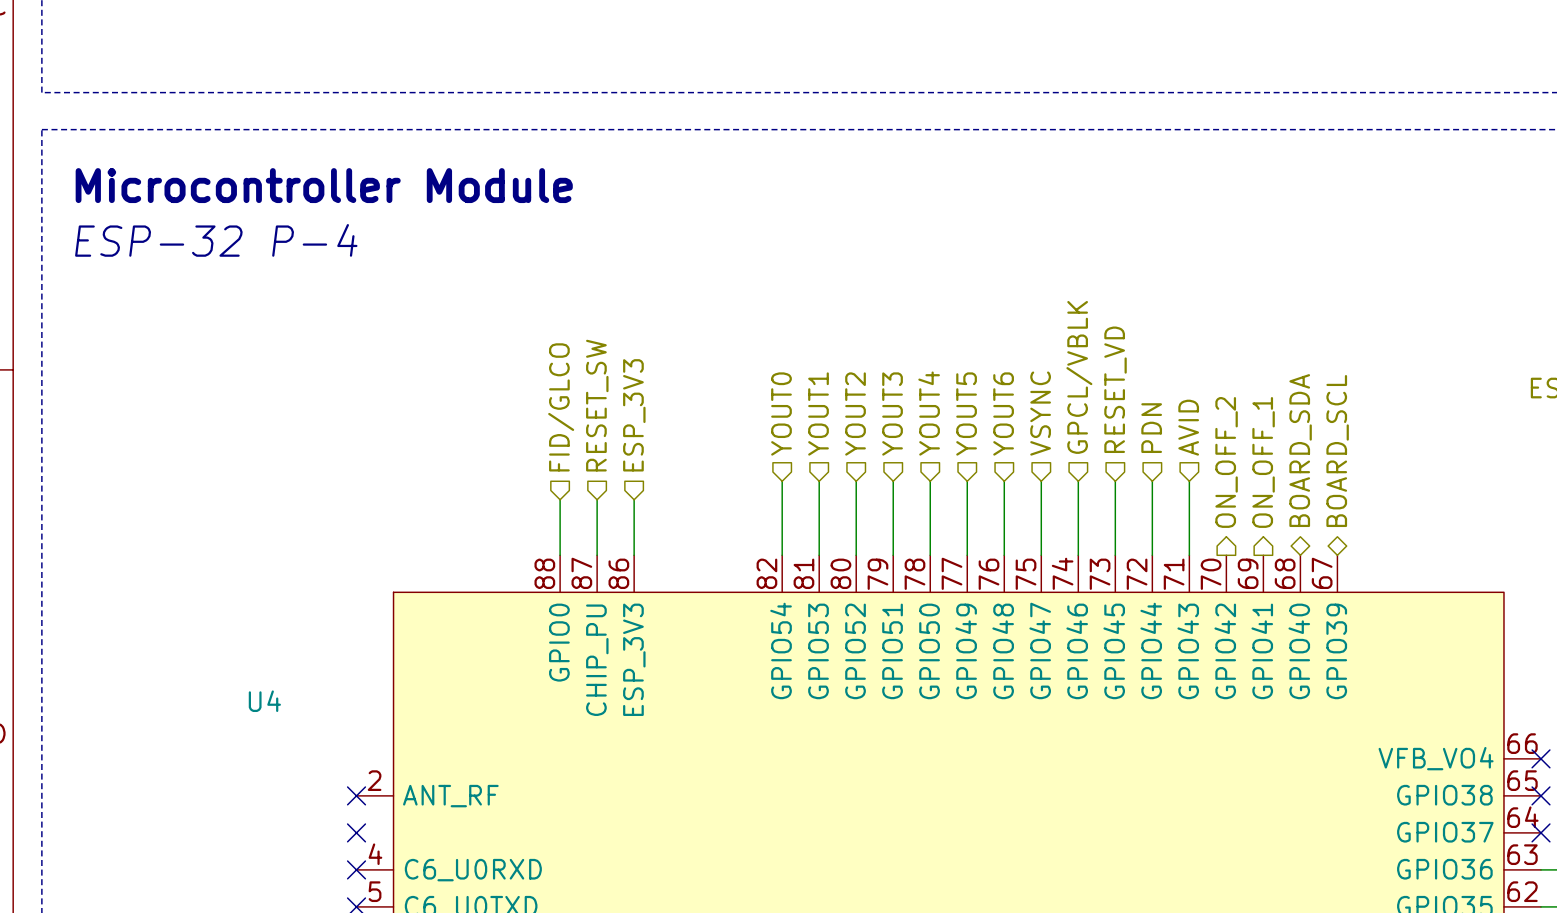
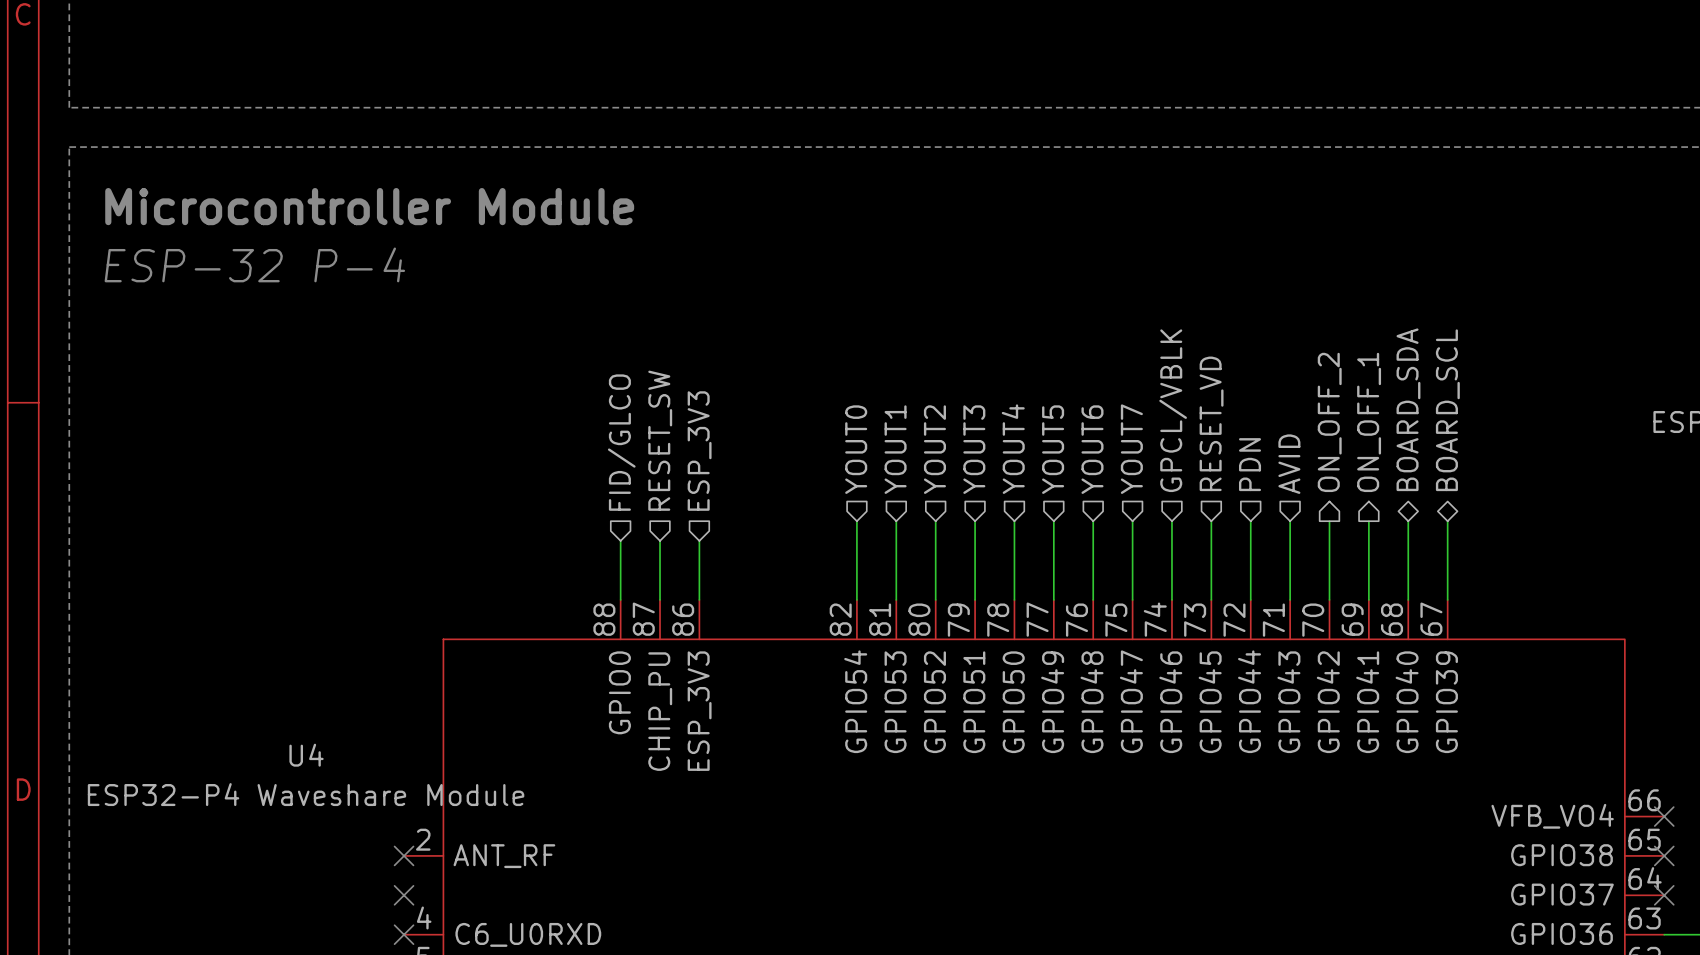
hierarchical label: VSYNC (1040, 413) -> YOUT7 (1131, 449)
hierarchical label position: BOARD_SDA (1300, 450) -> BOARD_SDA (1408, 409)
hierarchical label position: BOARD_SCL (1337, 451) -> BOARD_SCL (1447, 410)
hierarchical label position: ON_OFF_2 (1226, 462) -> ON_OFF_2 (1329, 422)
hierarchical label position: ON_OFF_1 (1263, 462) -> ON_OFF_1 (1369, 422)
wire: none -> (1329, 521) (1329, 599)
wire: none -> (1368, 521) (1368, 599)
wire: none -> (1408, 521) (1408, 599)
wire: none -> (1447, 521) (1447, 599)
U4 value: none -> ESP32-P4 Waveshare Module (306, 794)

